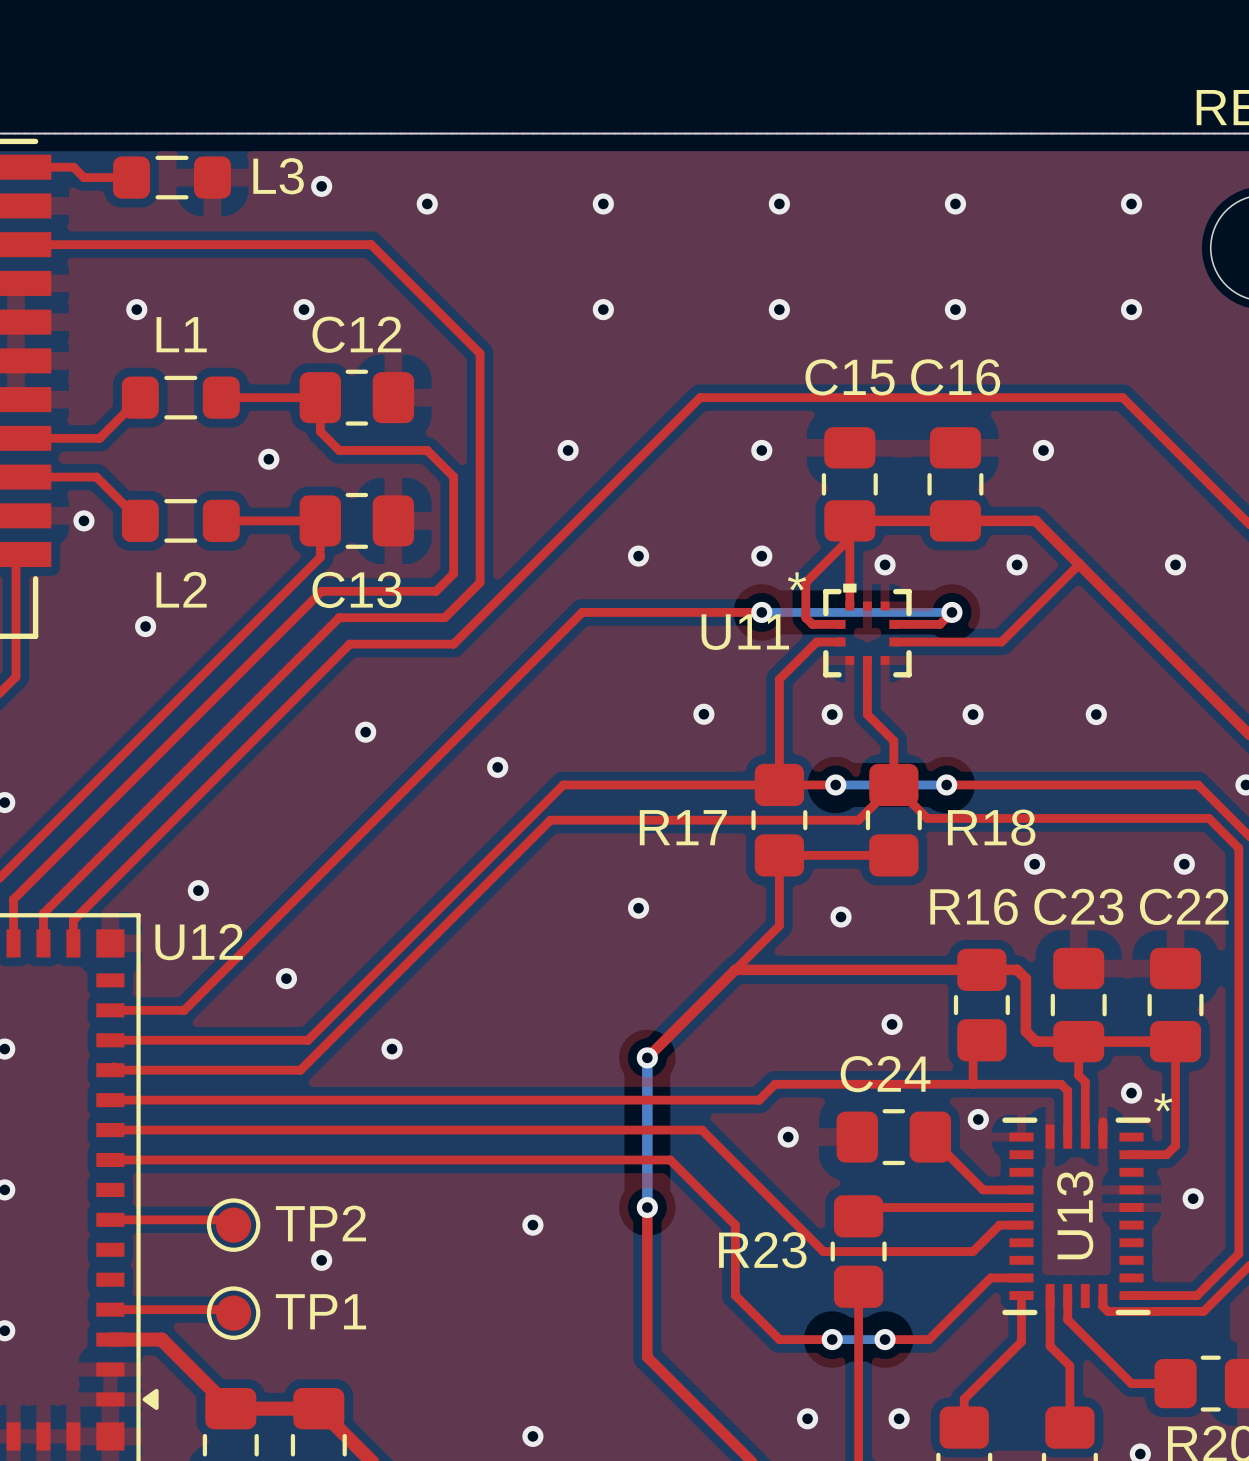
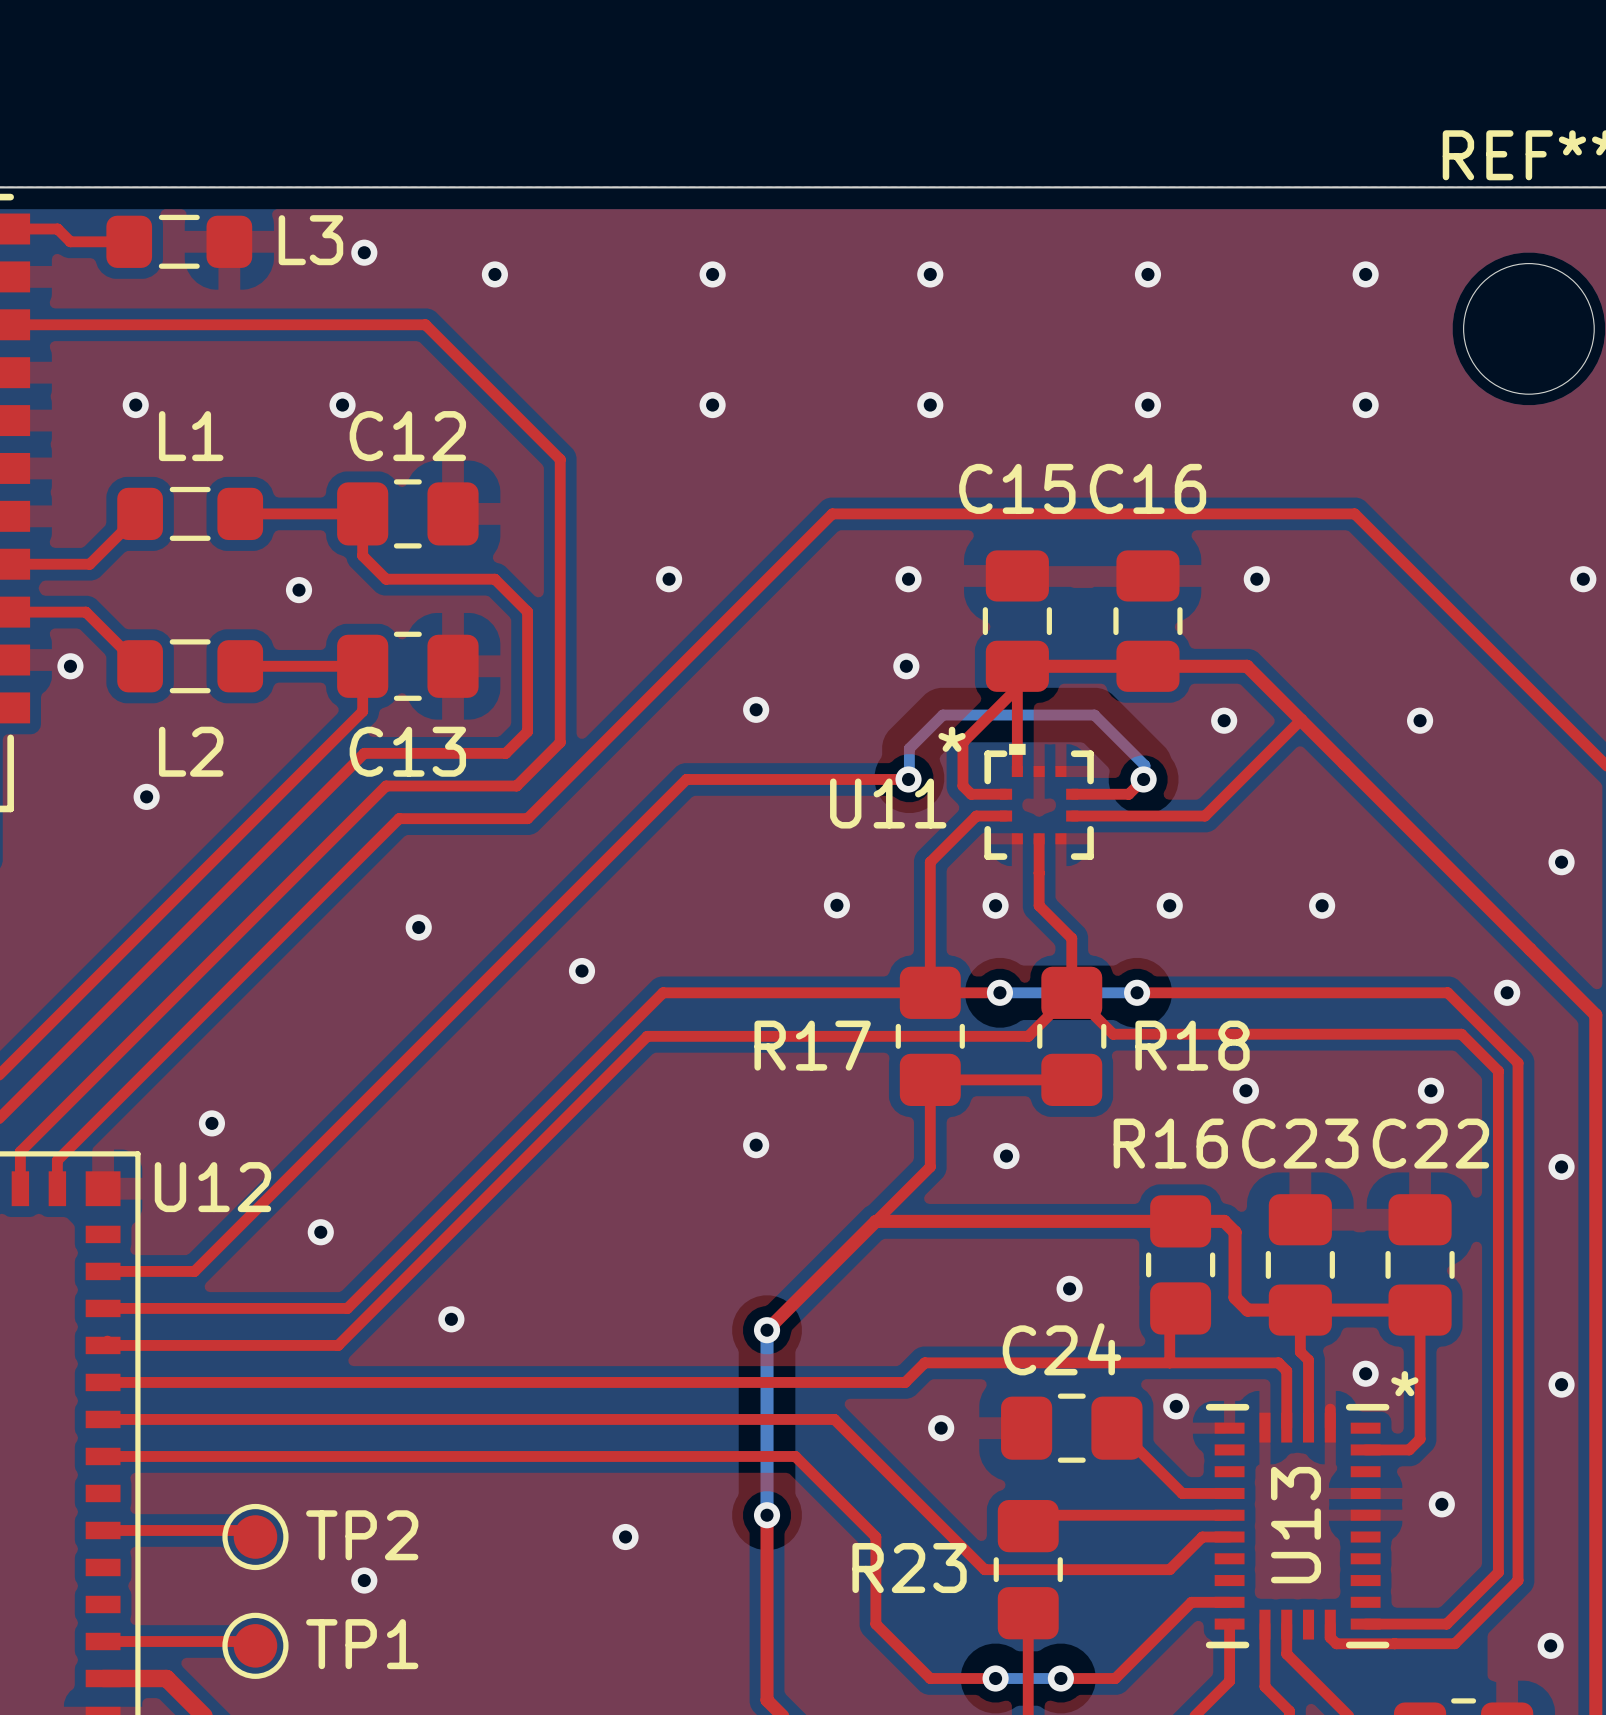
via position: (761, 556) -> (906, 666)
via: (885, 564) -> none
bottom track: (761, 612) (951, 612) -> (909, 778) (909, 748) (942, 715) (1094, 715) (1144, 765) (1144, 779)

